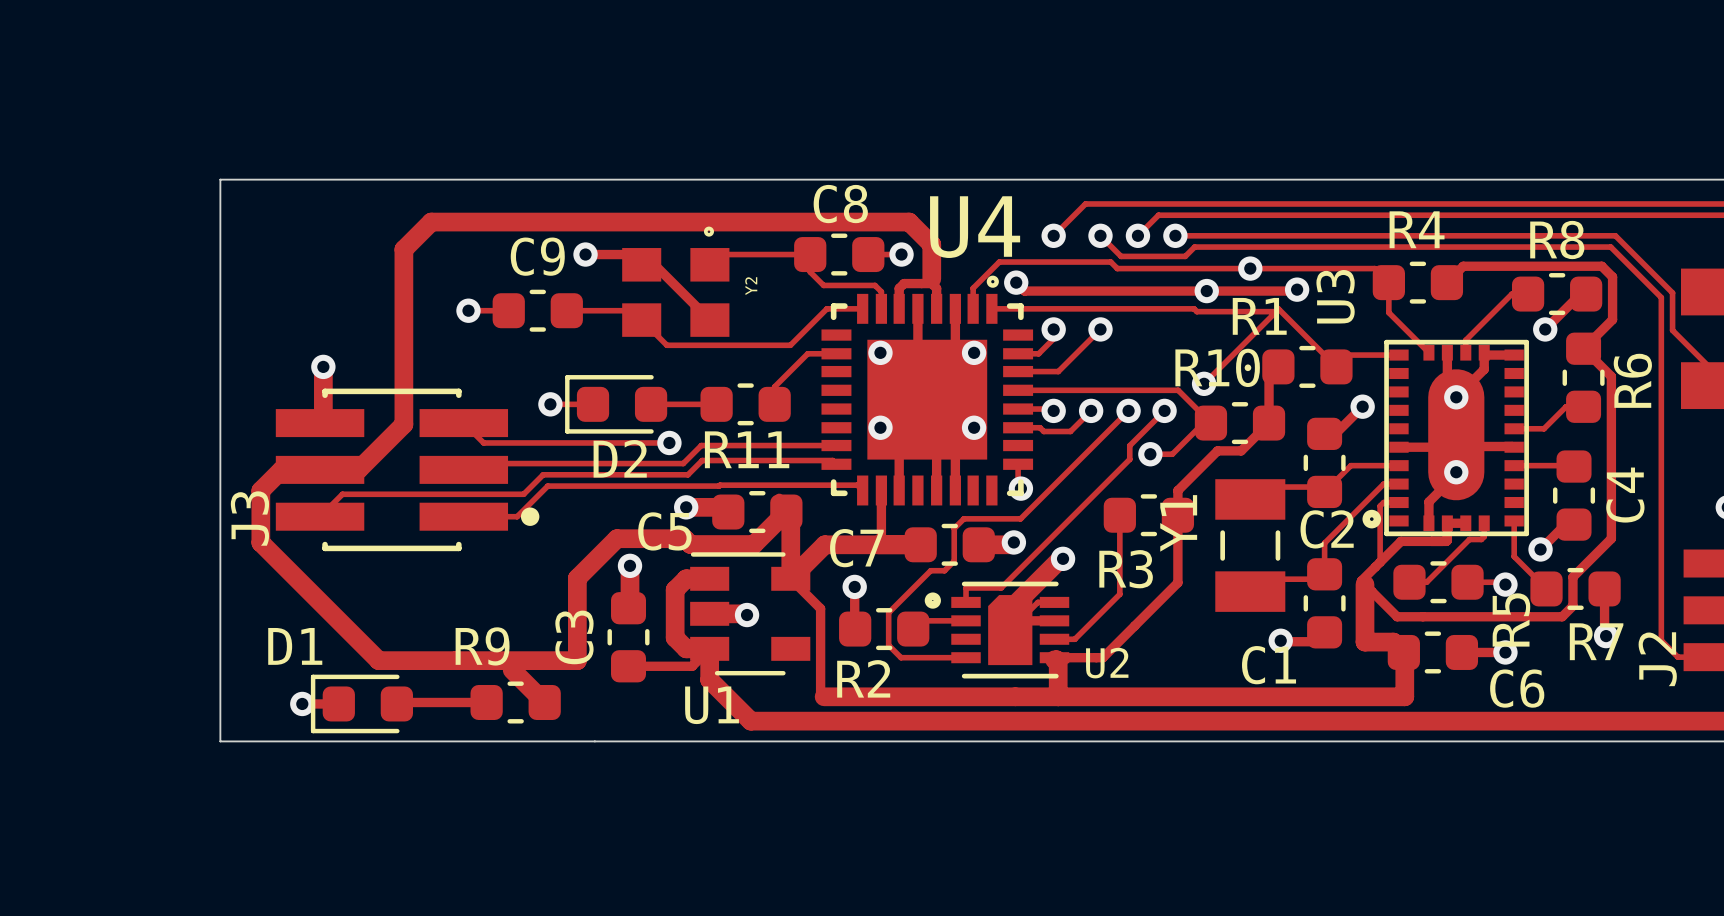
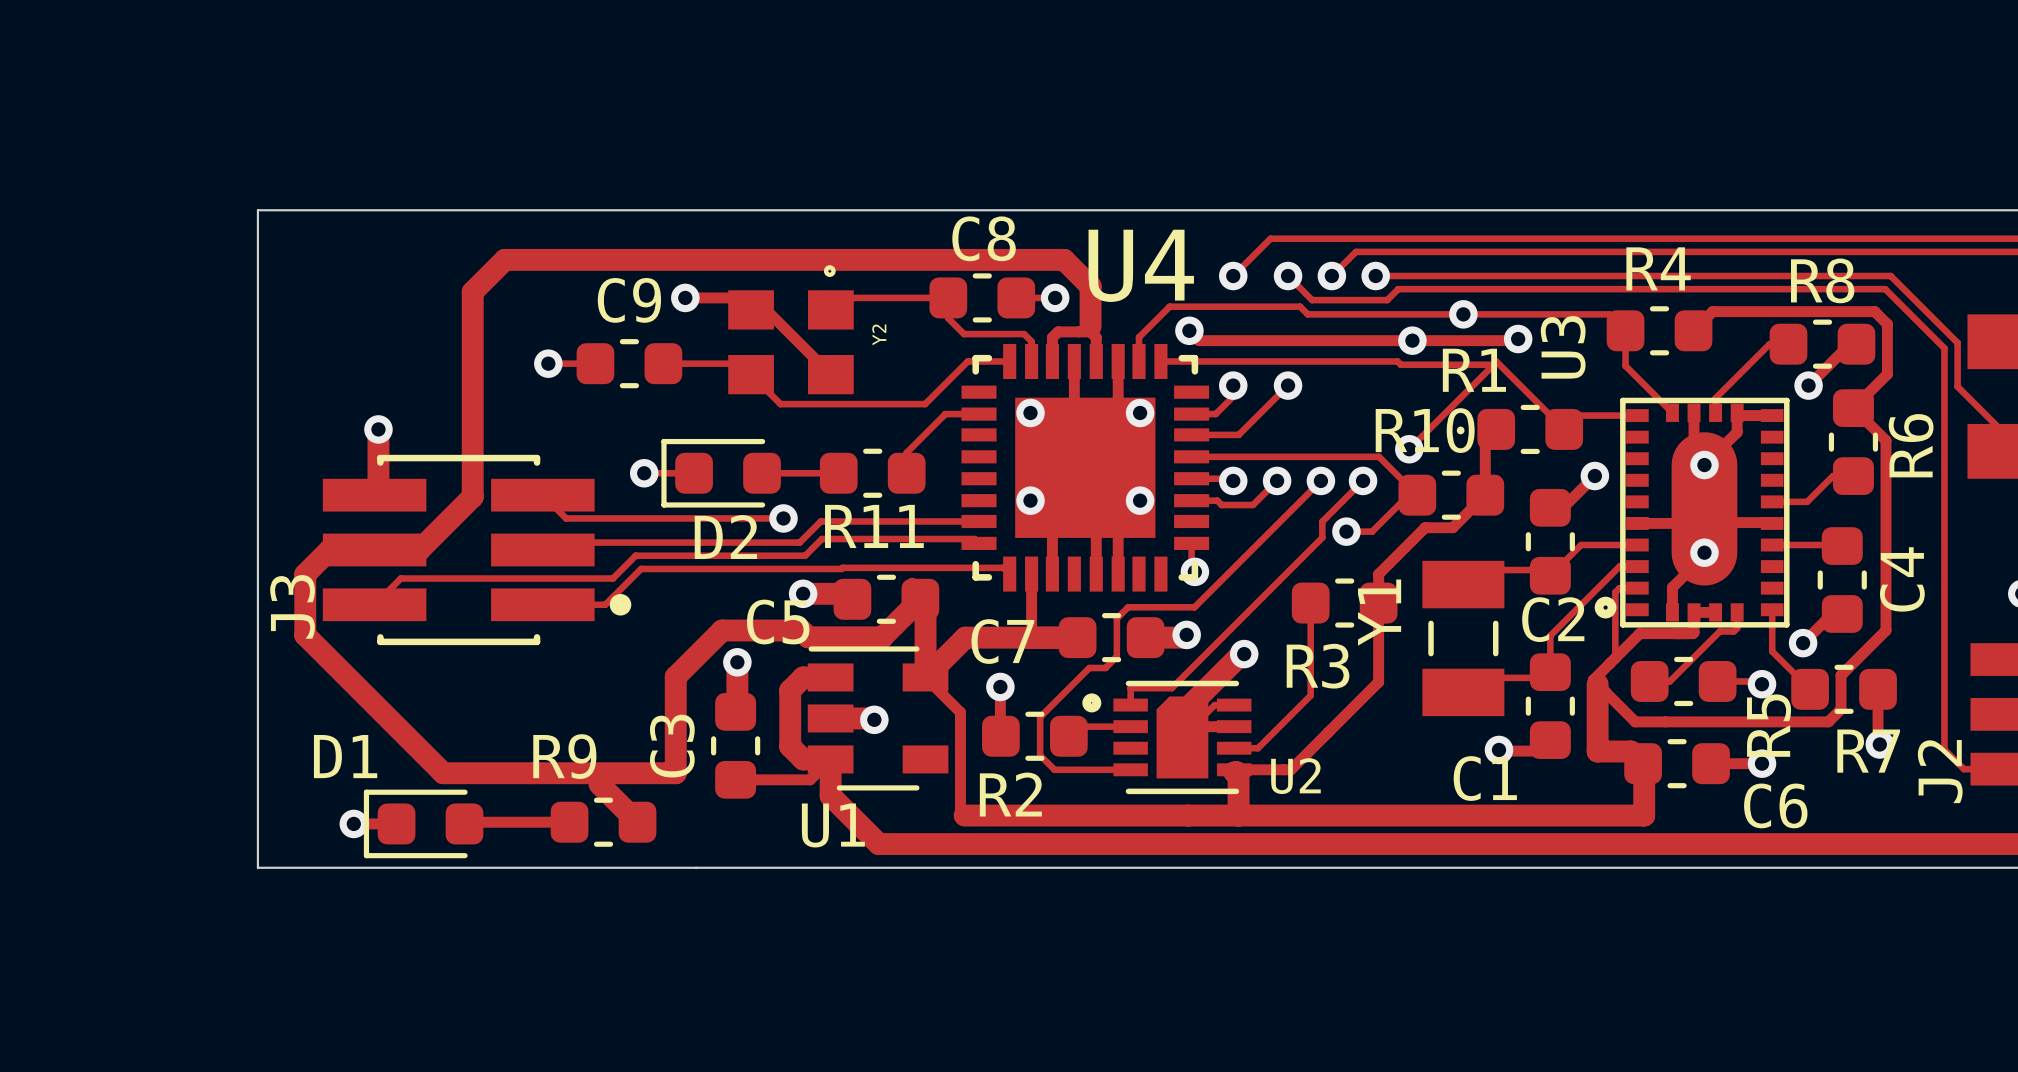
drawing: [986, 275, 999, 288] -> none

